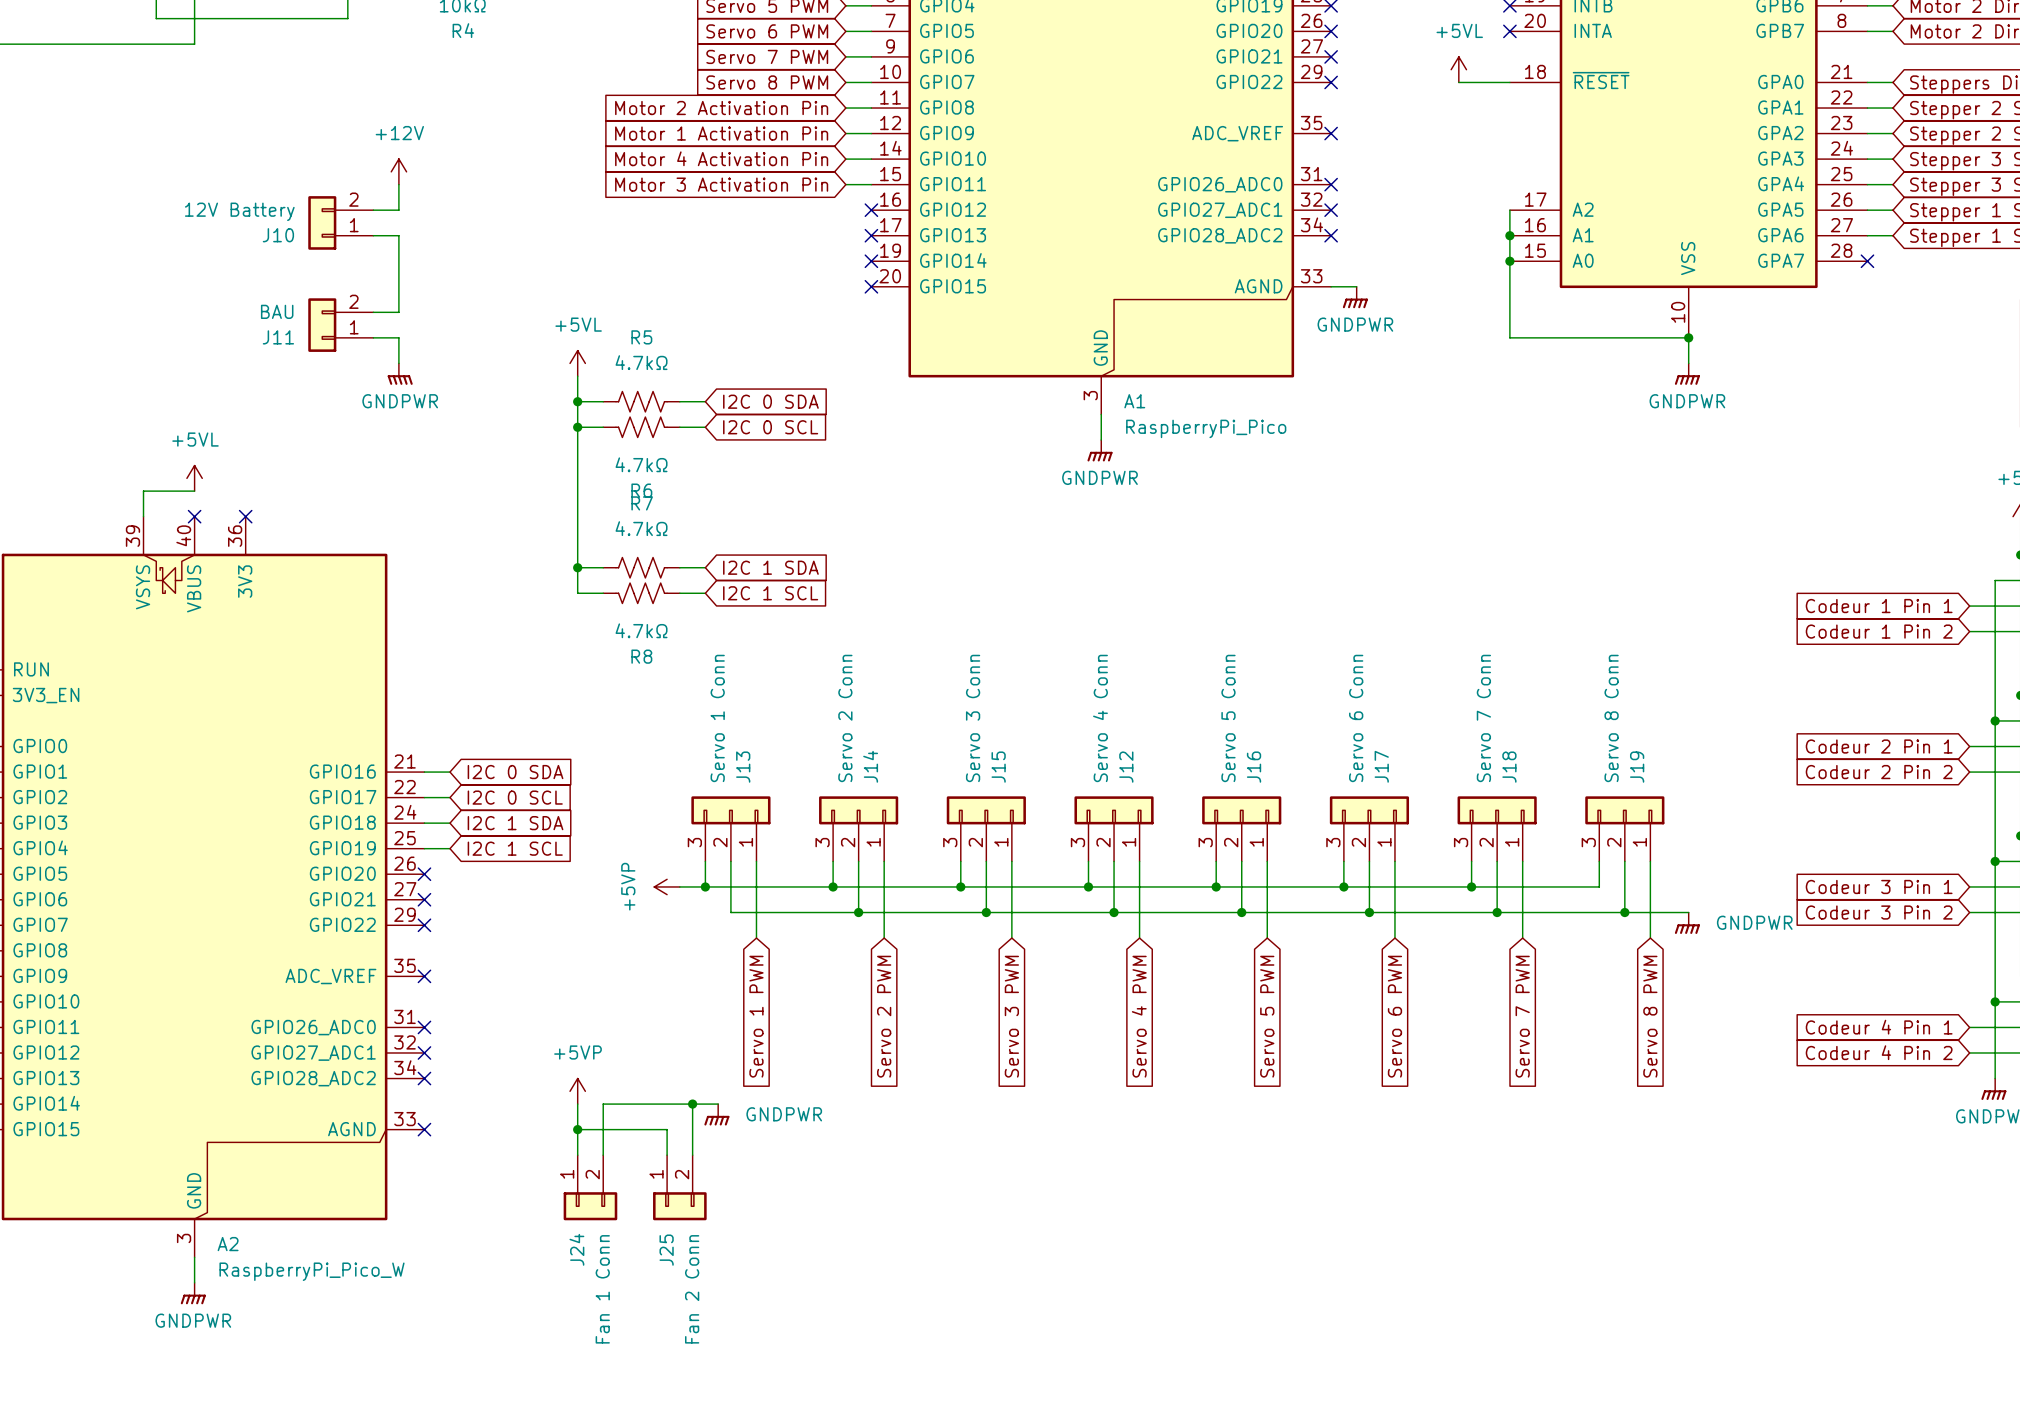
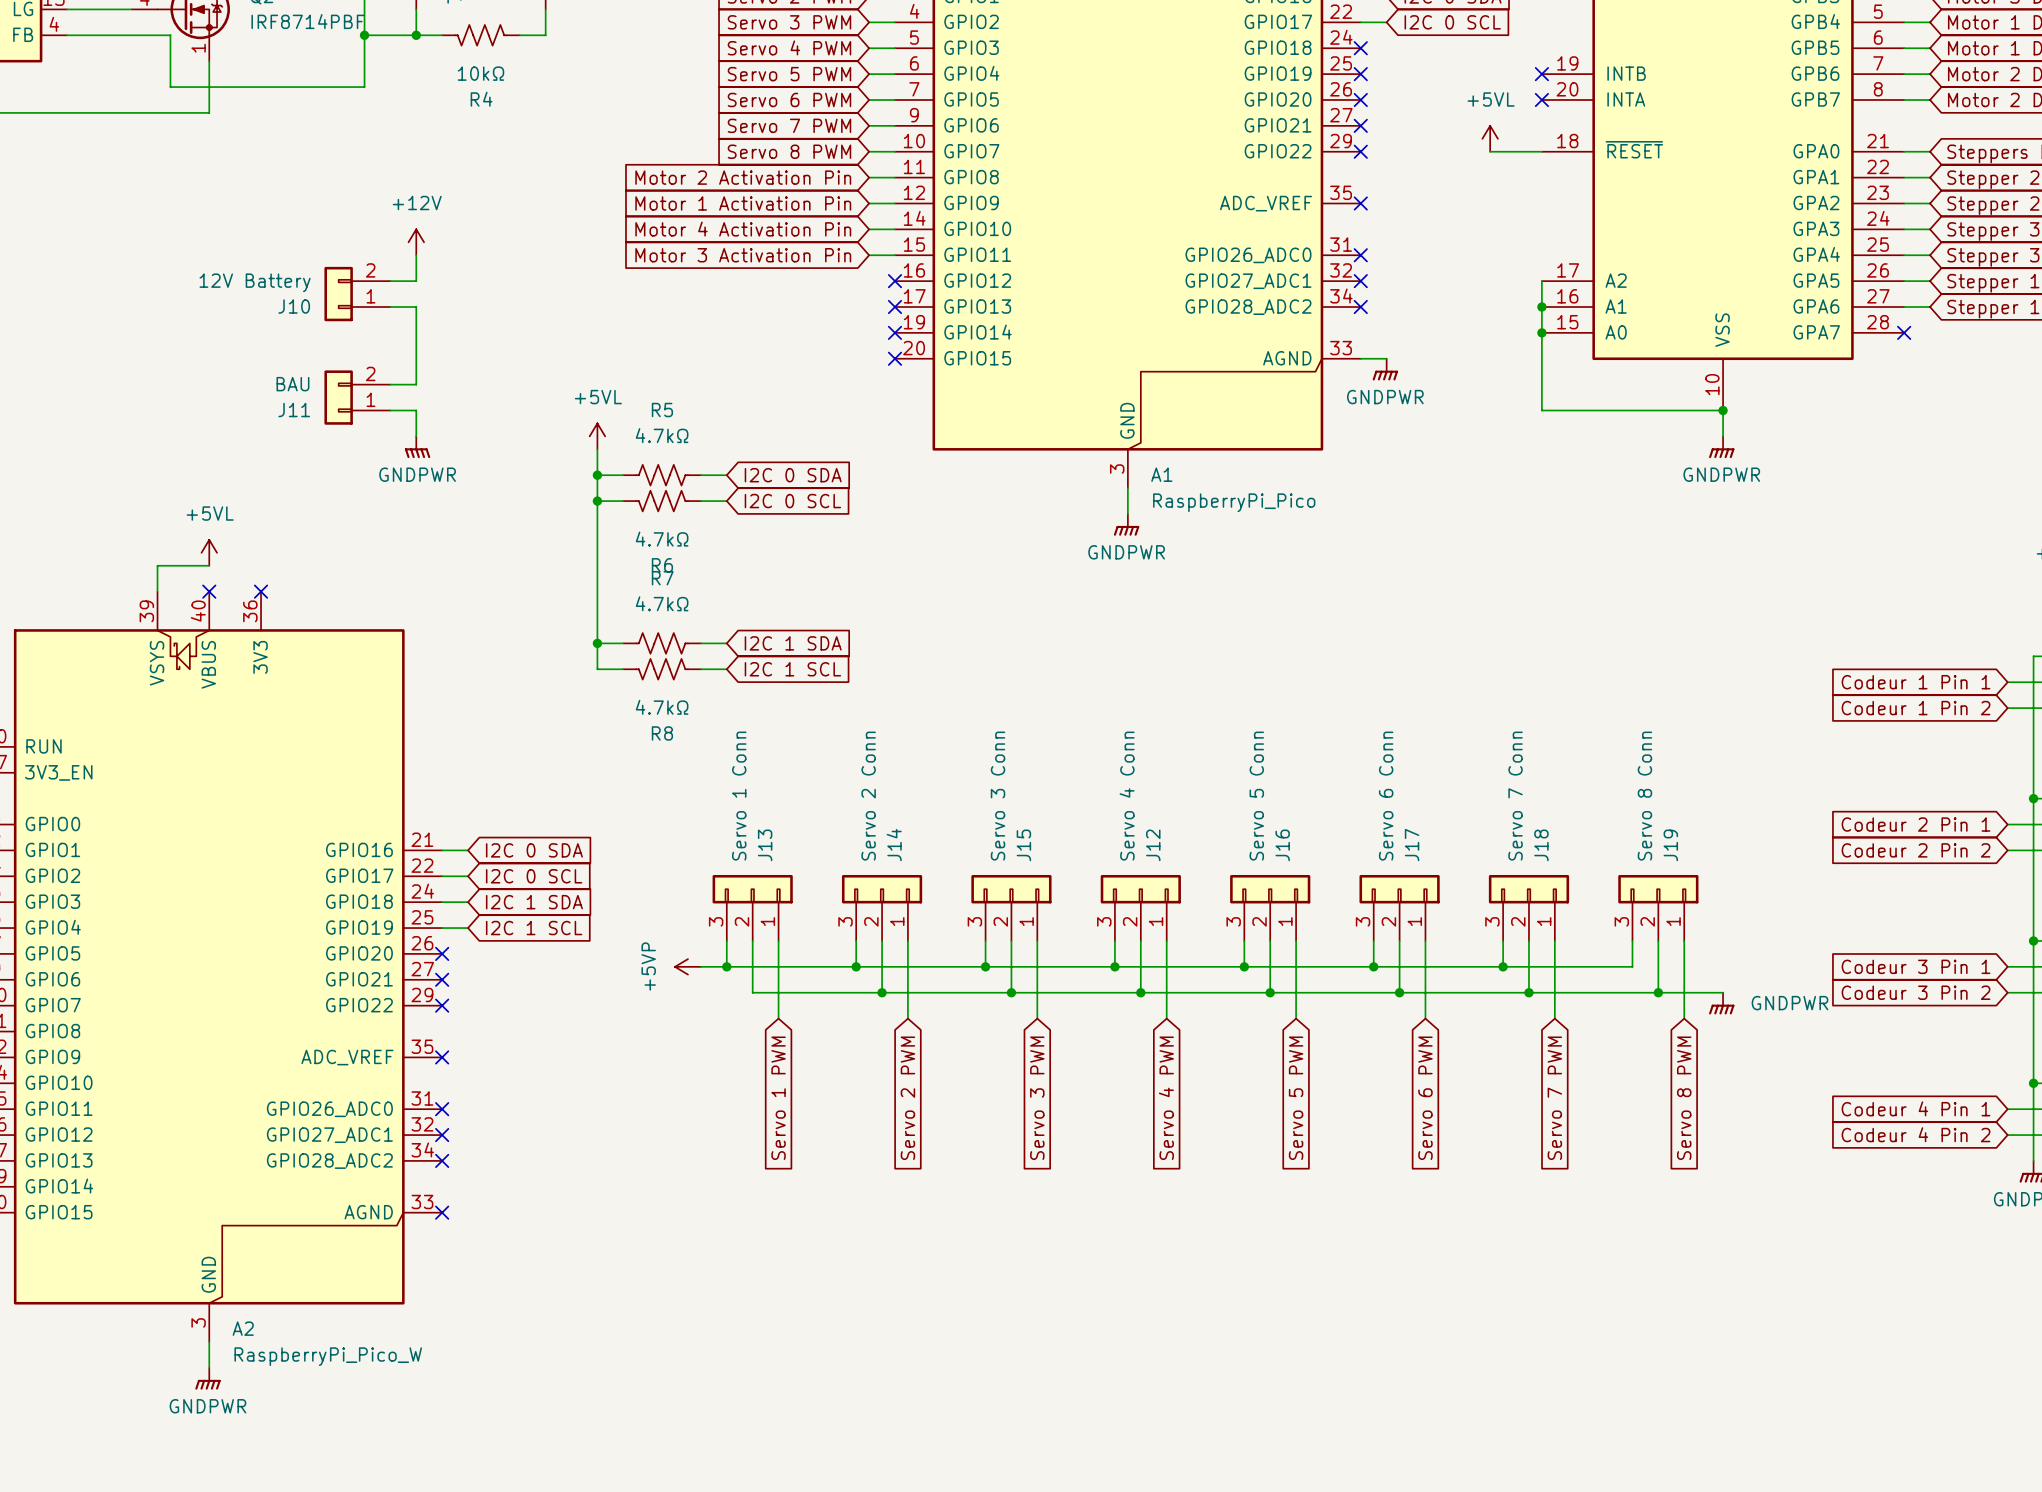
power symbol: +5VP (577, 1091) -> none
wire: (577, 1104) (577, 1155) -> none
wire: (692, 1104) (692, 1155) -> none
junction: (692, 1104) -> none
wire: (718, 1104) (603, 1104) (603, 1155) -> none
power symbol: GNDPWR (716, 1114) -> none
wire: (577, 1129) (667, 1129) (667, 1155) -> none
junction: (577, 1129) -> none
J24: Fan 1 Conn (590, 1187) -> none
J25: Fan 2 Conn (679, 1187) -> none

